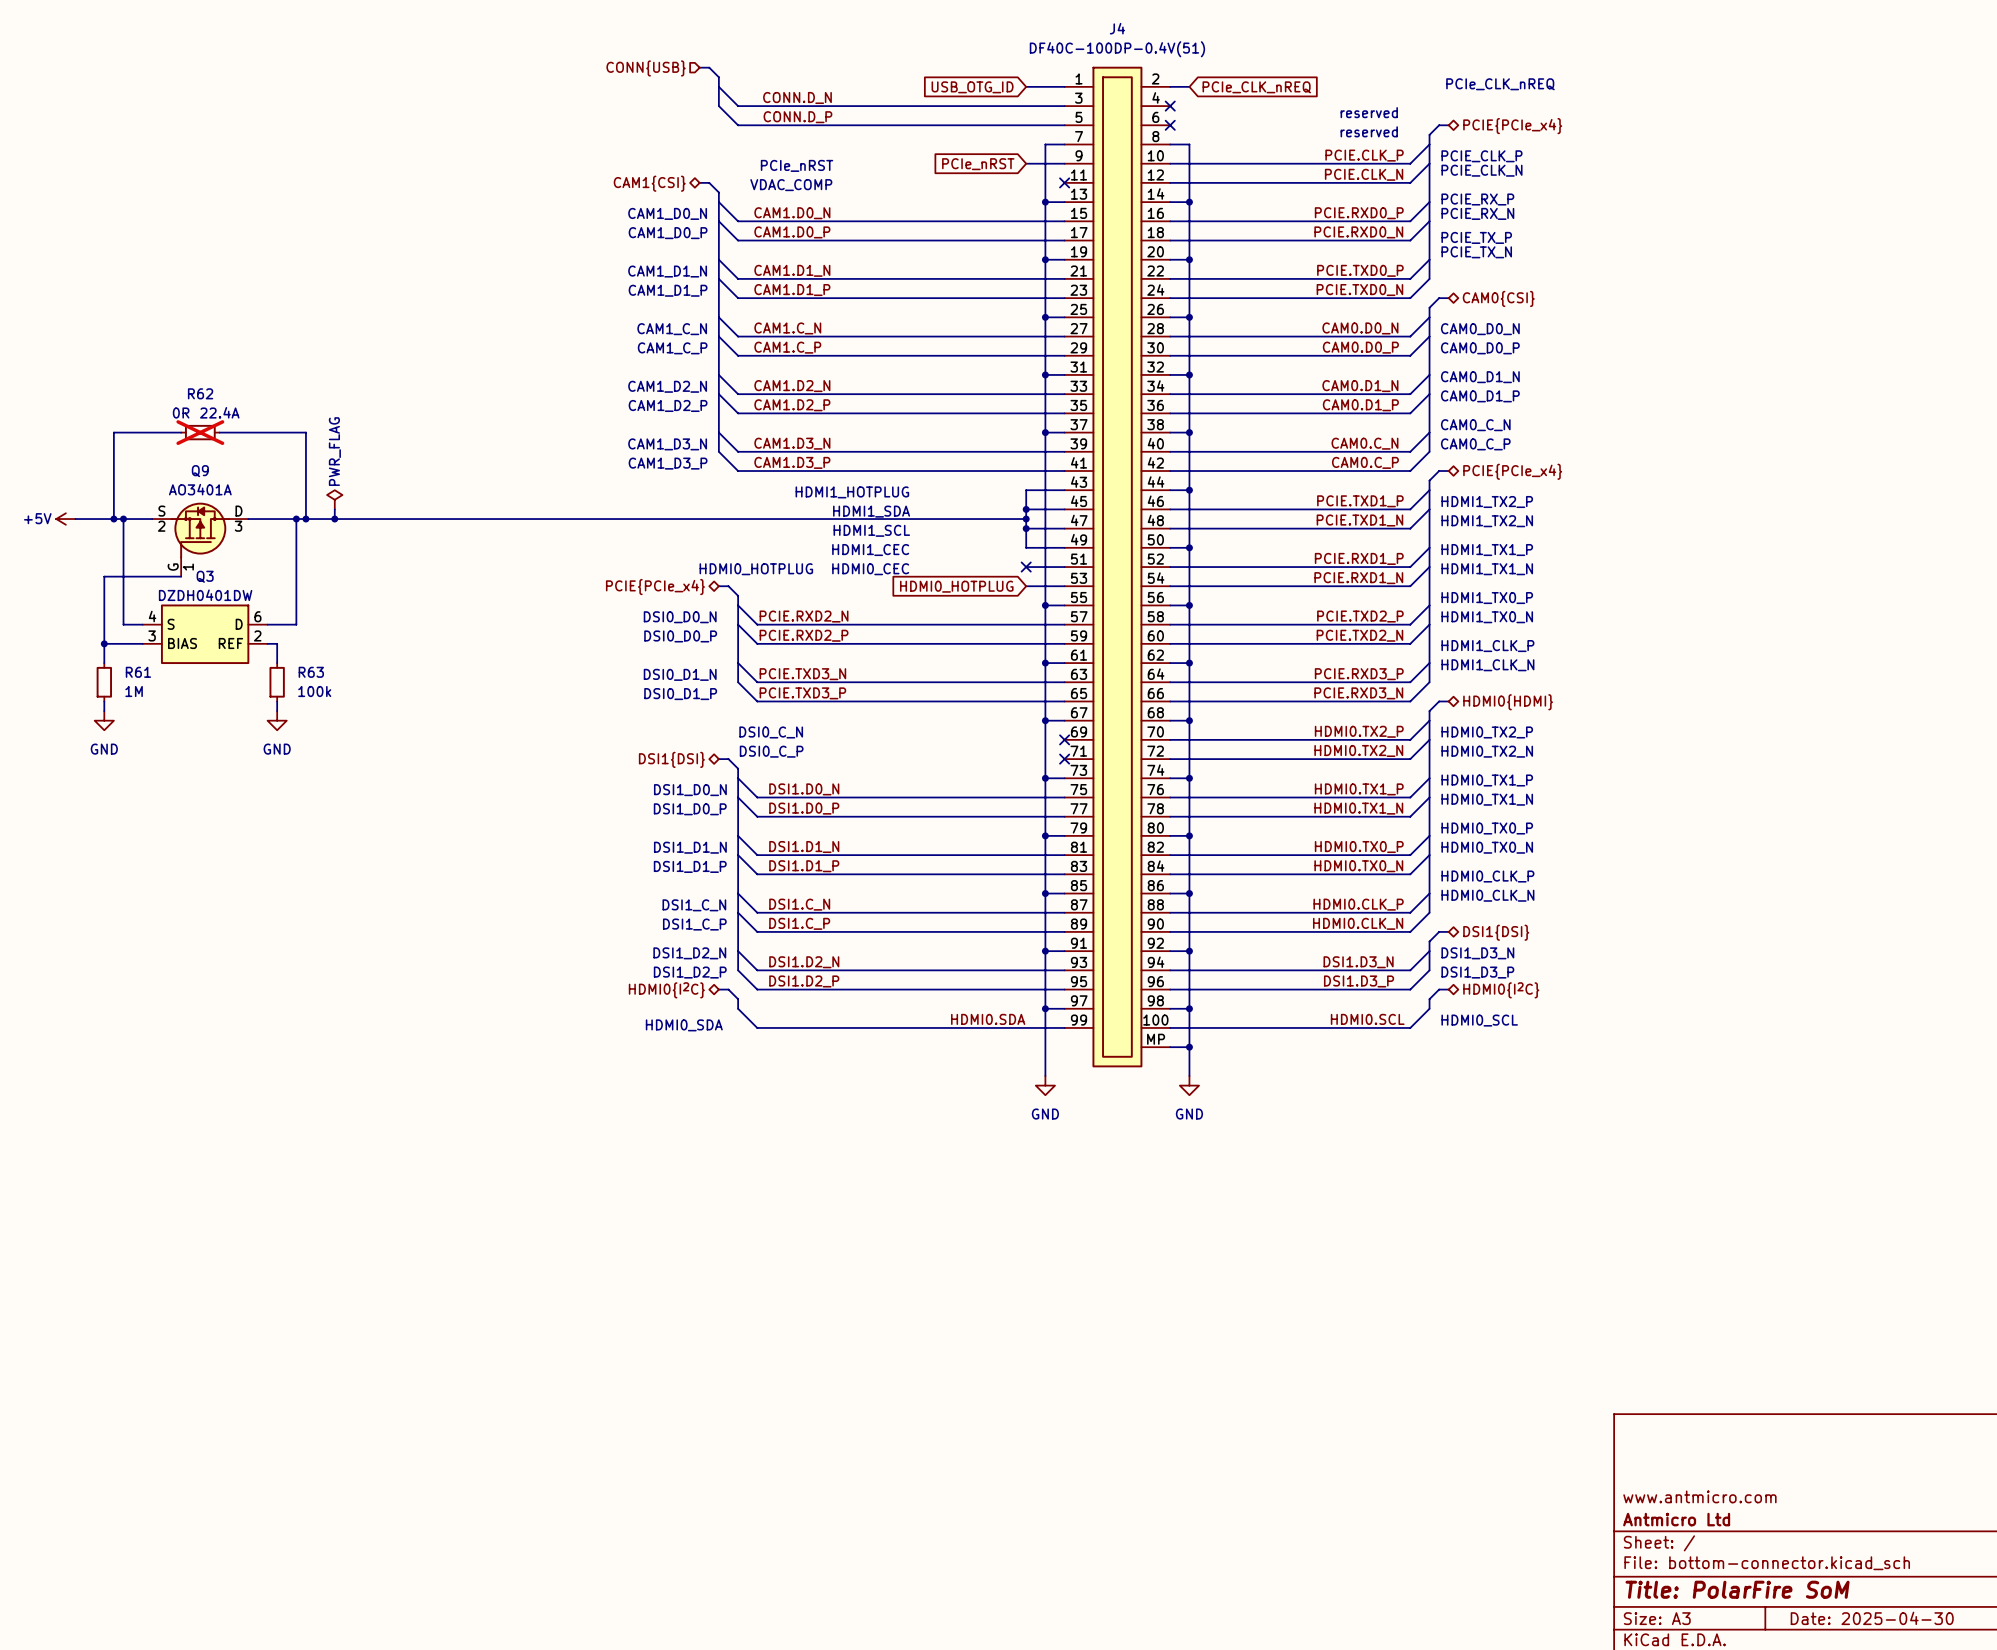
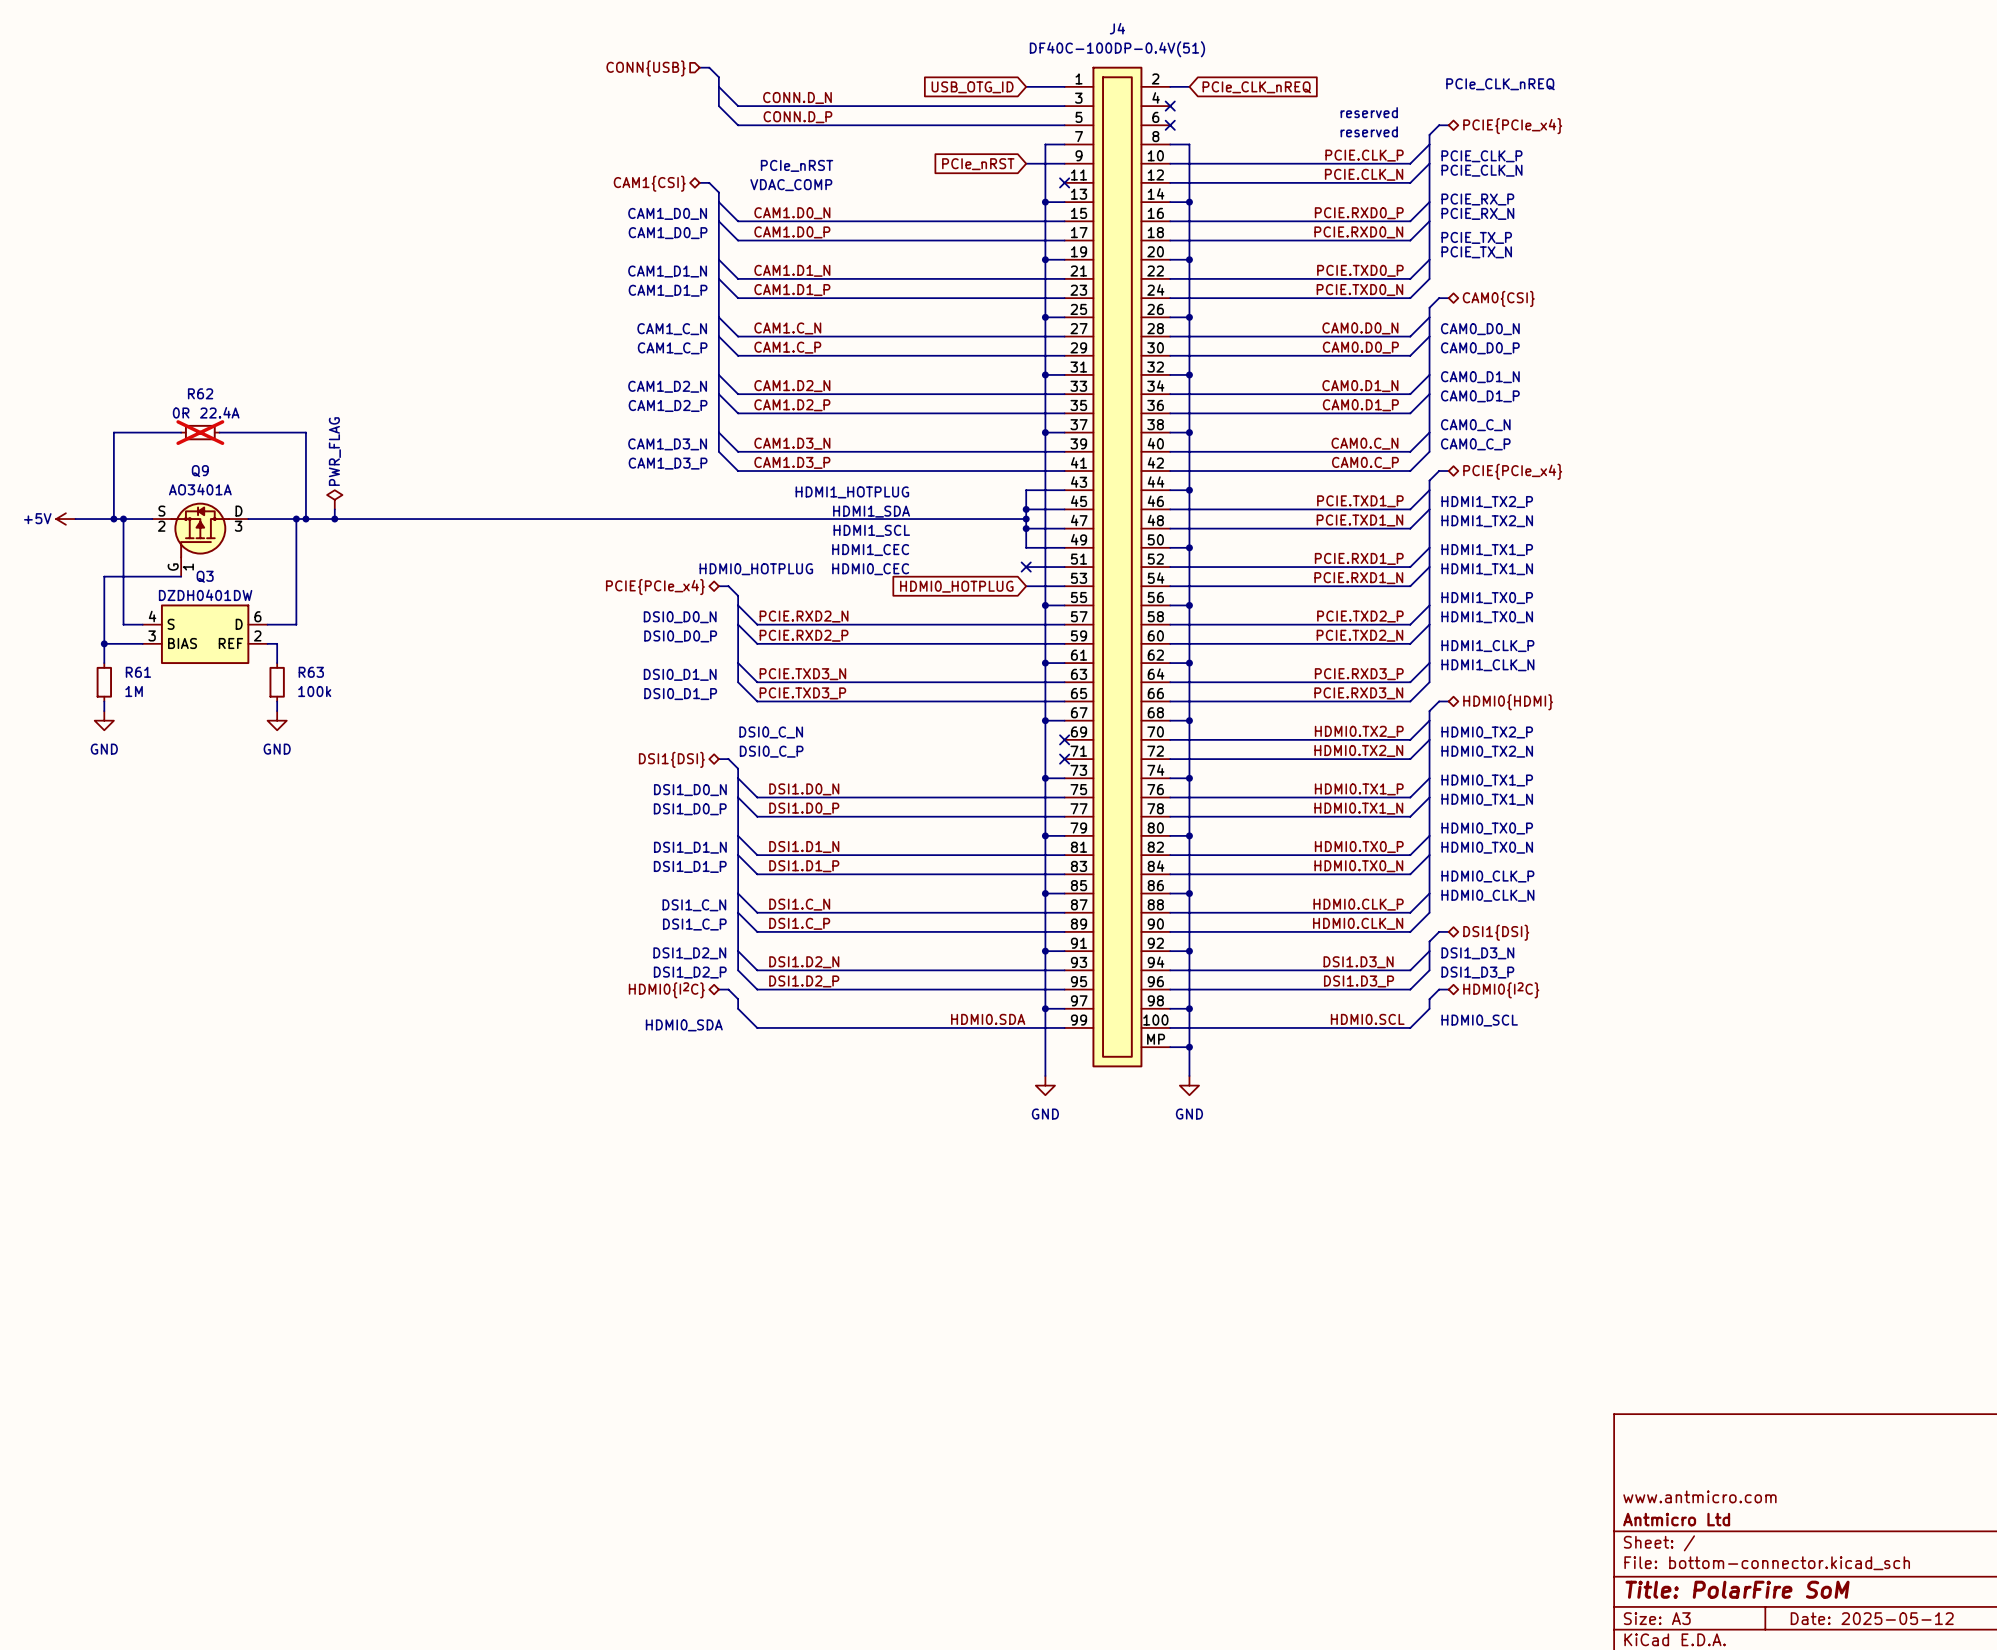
title block: Date: 2025-04-30 (1872, 1618) -> Date: 2025-05-12 (1872, 1618)

